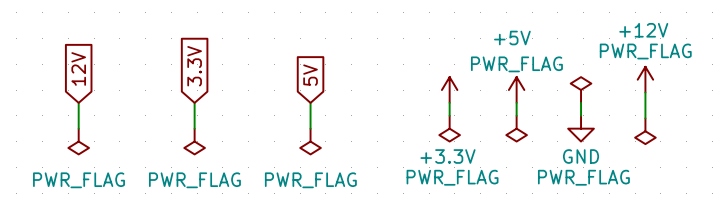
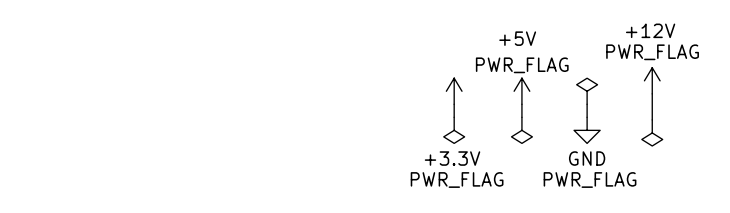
global label: 3.3V (194, 66) -> none
global label: 12V (78, 68) -> none
global label: 5V (310, 75) -> none
wire: (78, 102) (78, 128) -> none
wire: (194, 102) (194, 128) -> none
wire: (310, 102) (310, 128) -> none
power symbol: PWR_FLAG (78, 141) -> none
power symbol: PWR_FLAG (194, 141) -> none
power symbol: PWR_FLAG (310, 141) -> none

